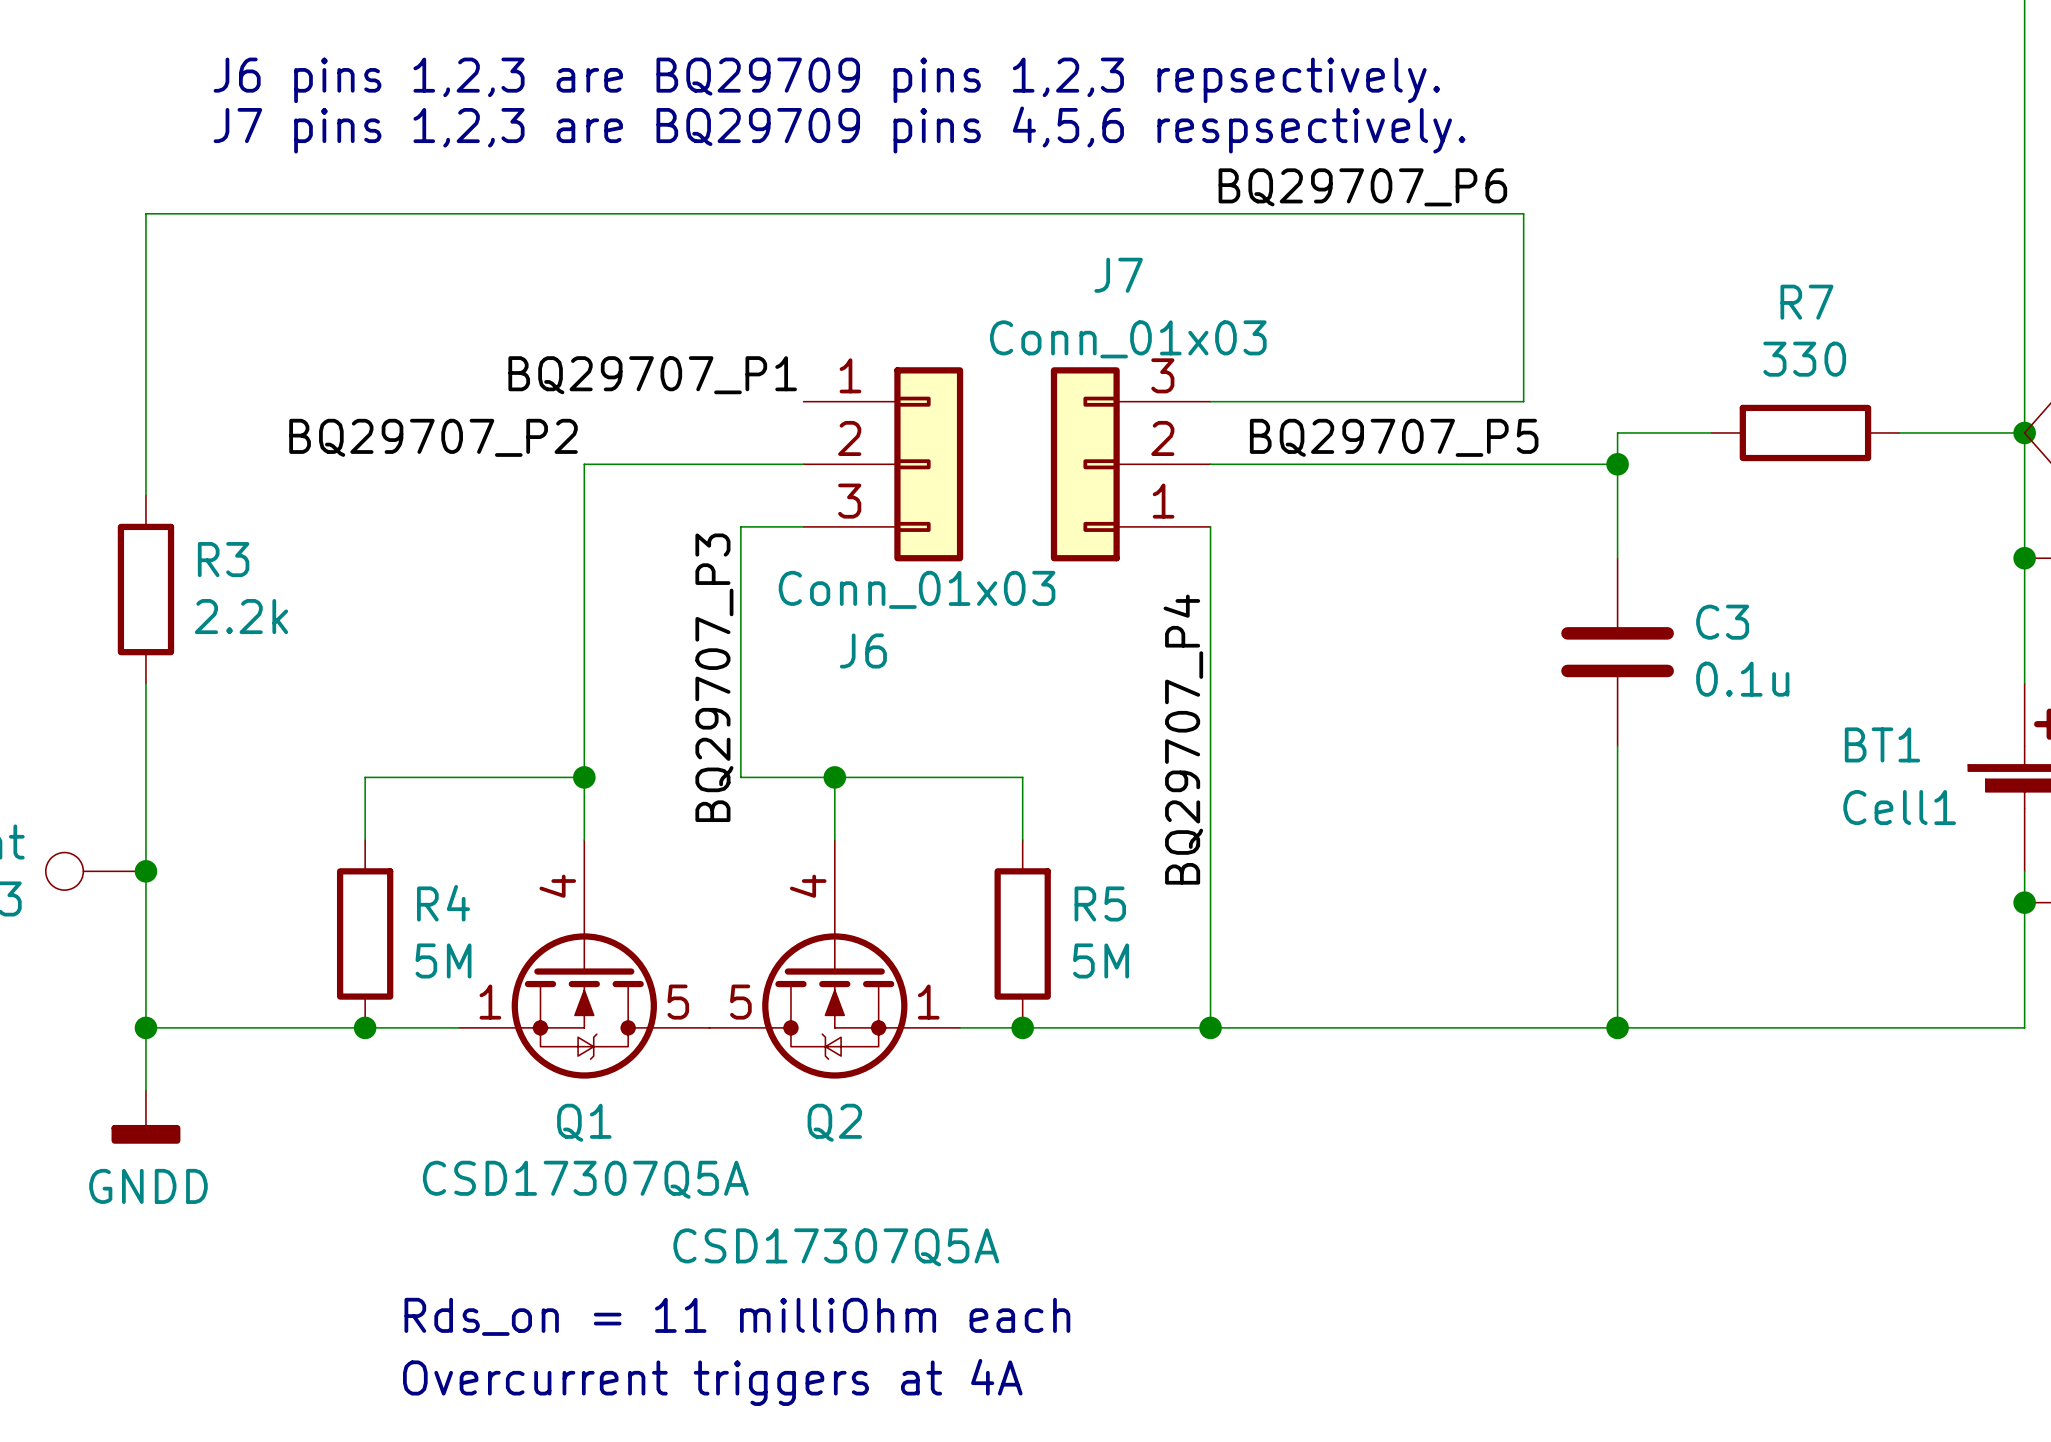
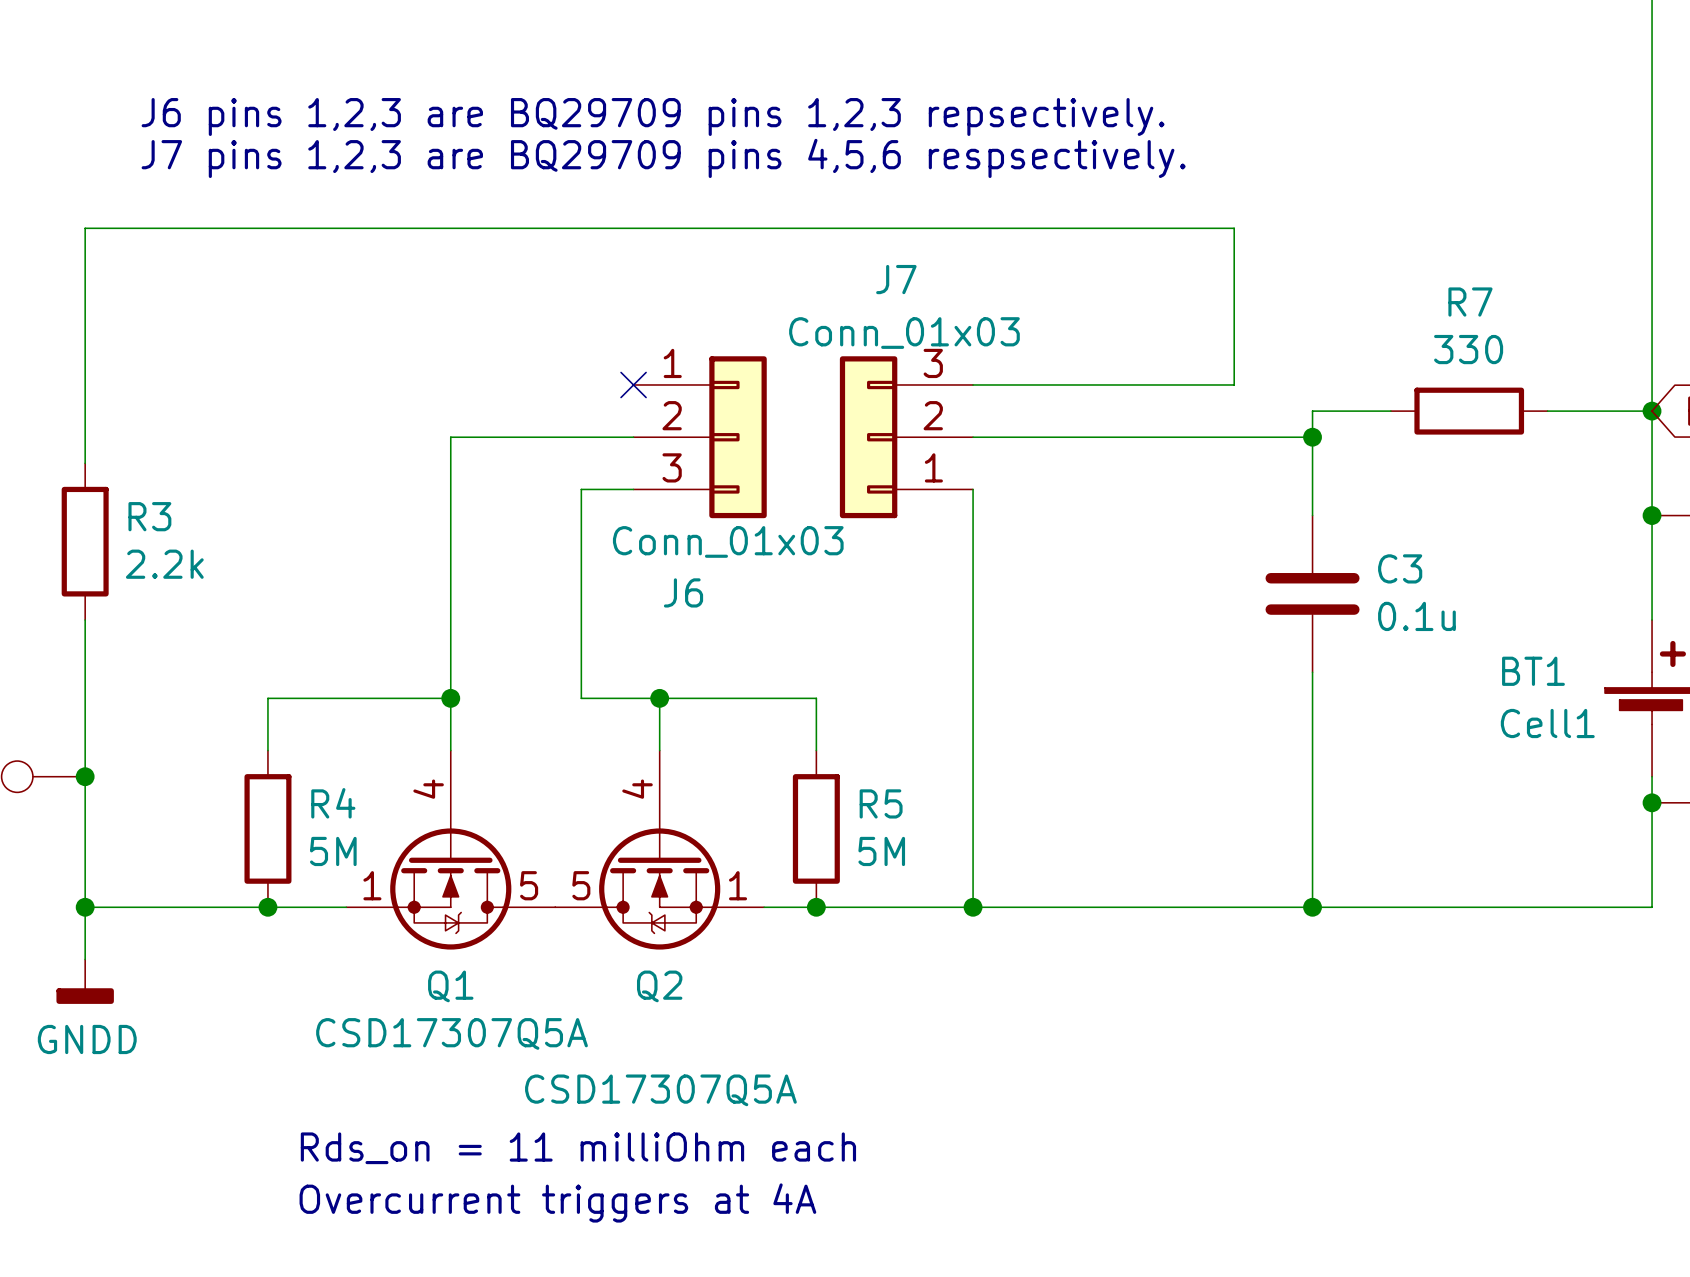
label: BQ29707_P6 (1362, 187) -> none
label: BQ29707_P1 (652, 375) -> none
no-connect mark: none -> (633, 384)
label: BQ29707_P2 (433, 437) -> none
label: BQ29707_P5 (1394, 437) -> none
label: BQ29707_P3 (714, 677) -> none
label: BQ29707_P4 (1183, 739) -> none

